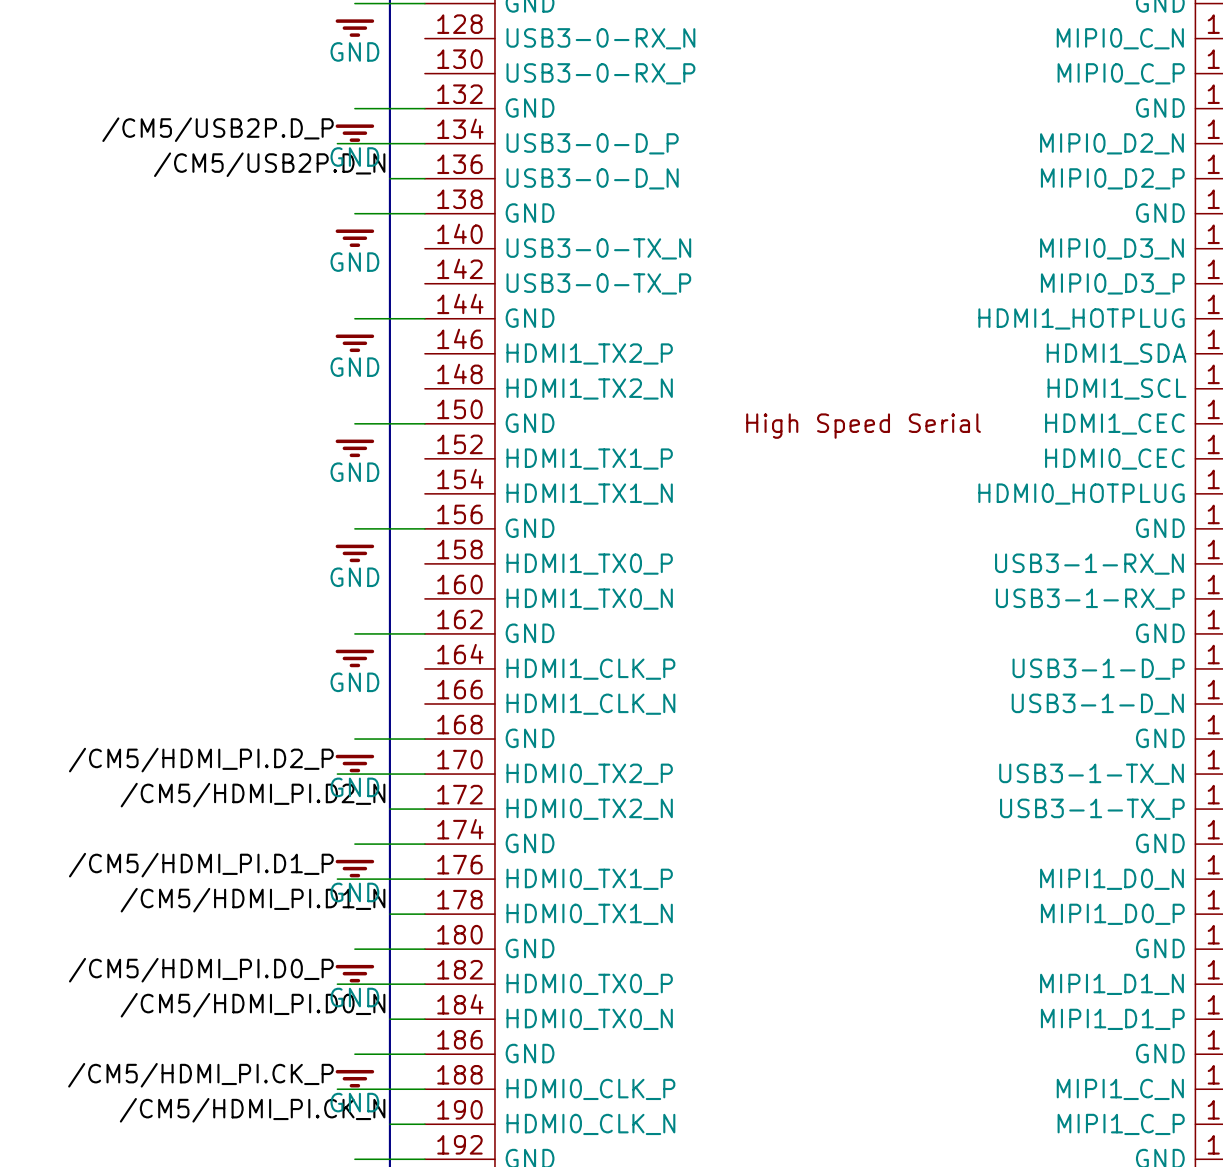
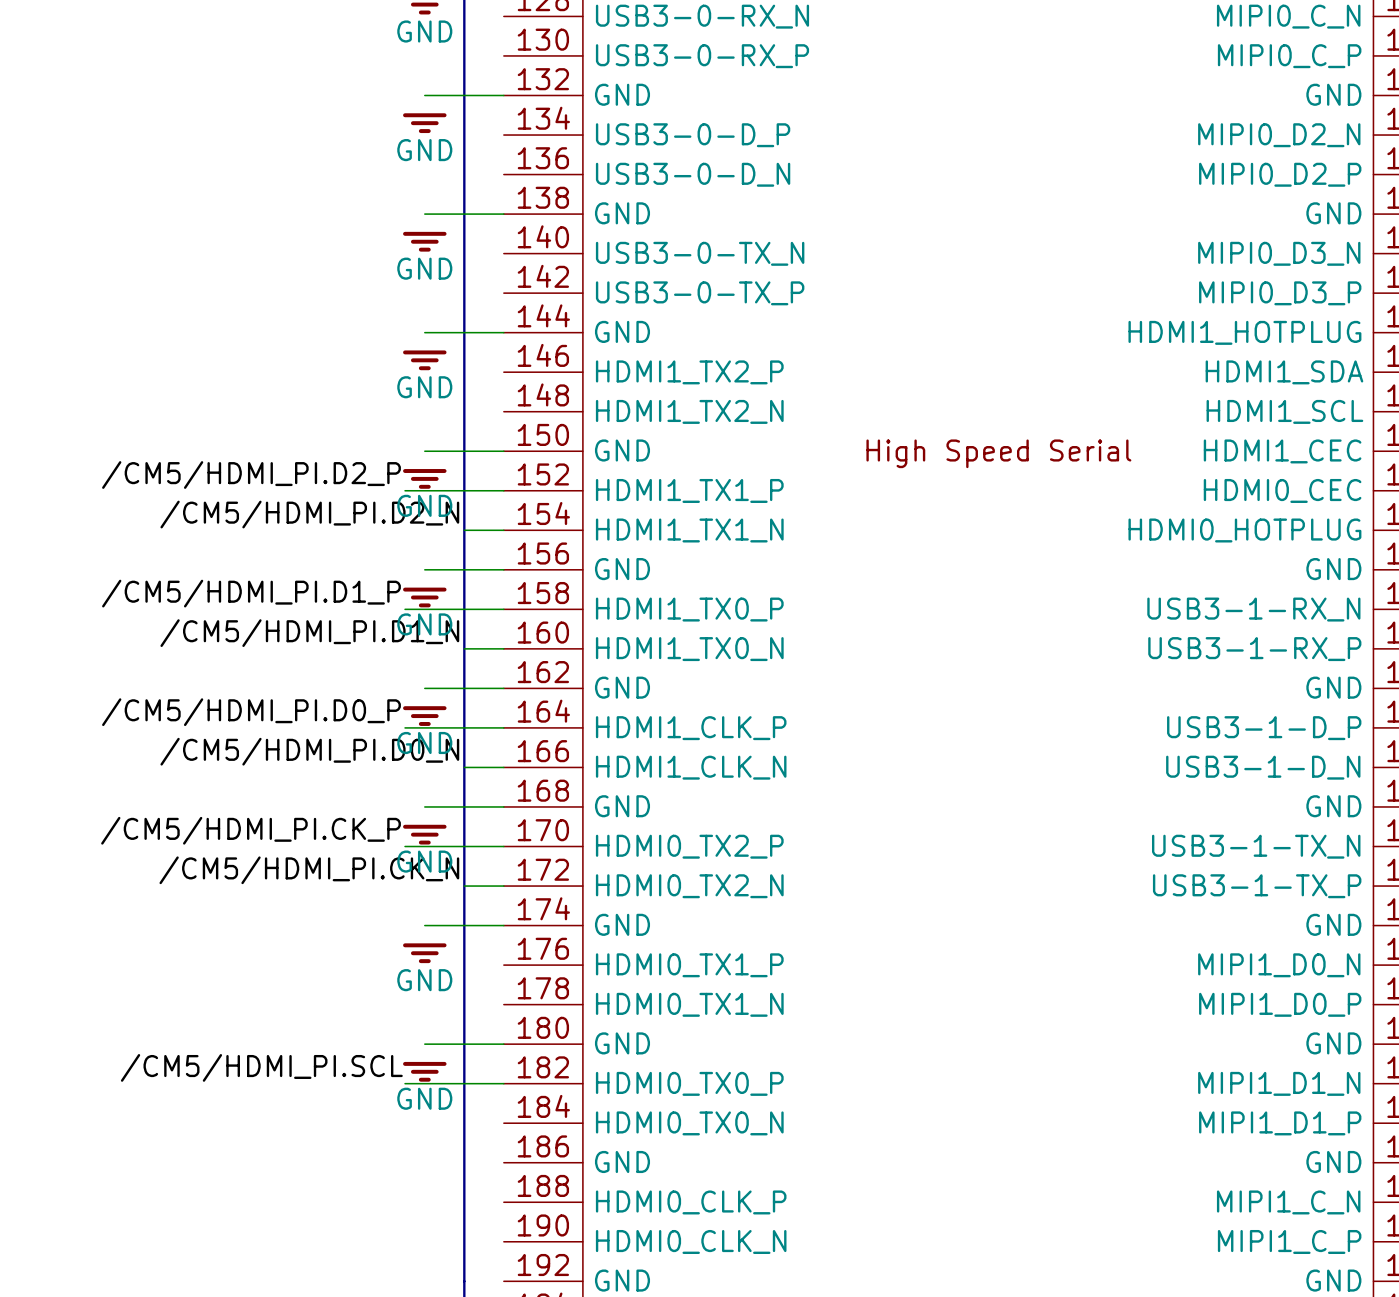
label: /CM5/USB2P.D_P (218, 129) -> none
wire: (337, 143) (424, 143) -> (405, 490) (503, 490)
label: /CM5/USB2P.D_N (269, 164) -> none
wire: (389, 178) (424, 178) -> (464, 530) (503, 530)
label: none -> /CM5/HDMI_PI.D2_P (251, 475)
label: none -> /CM5/HDMI_PI.D2_N (309, 514)
label: none -> /CM5/HDMI_PI.D0_P (251, 712)
wire: none -> (405, 727) (503, 727)
label: /CM5/HDMI_PI.D2_P (201, 760) -> /CM5/HDMI_PI.CK_P (251, 830)
label: /CM5/HDMI_PI.D2_N (253, 795) -> /CM5/HDMI_PI.CK_N (309, 870)
label position: /CM5/HDMI_PI.D1_P (201, 865) -> /CM5/HDMI_PI.D1_P (251, 593)
wire: (337, 879) (424, 879) -> (405, 609) (503, 609)
label position: /CM5/HDMI_PI.D1_N (253, 900) -> /CM5/HDMI_PI.D1_N (309, 633)
wire: (389, 914) (424, 914) -> (464, 648) (503, 648)
label: /CM5/HDMI_PI.D0_P (201, 970) -> /CM5/HDMI_PI.SCL (261, 1067)
label position: /CM5/HDMI_PI.D0_N (253, 1005) -> /CM5/HDMI_PI.D0_N (309, 751)
wire: (389, 1019) (424, 1019) -> (464, 767) (503, 767)
wire: (354, 1054) (424, 1054) -> none
label: /CM5/HDMI_PI.CK_P (200, 1075) -> none
power symbol: GND (354, 1078) -> none
wire: (337, 1089) (424, 1089) -> none
label: /CM5/HDMI_PI.CK_N (252, 1110) -> none
wire: (389, 1124) (424, 1124) -> none
wire: (354, 1159) (424, 1159) -> none

